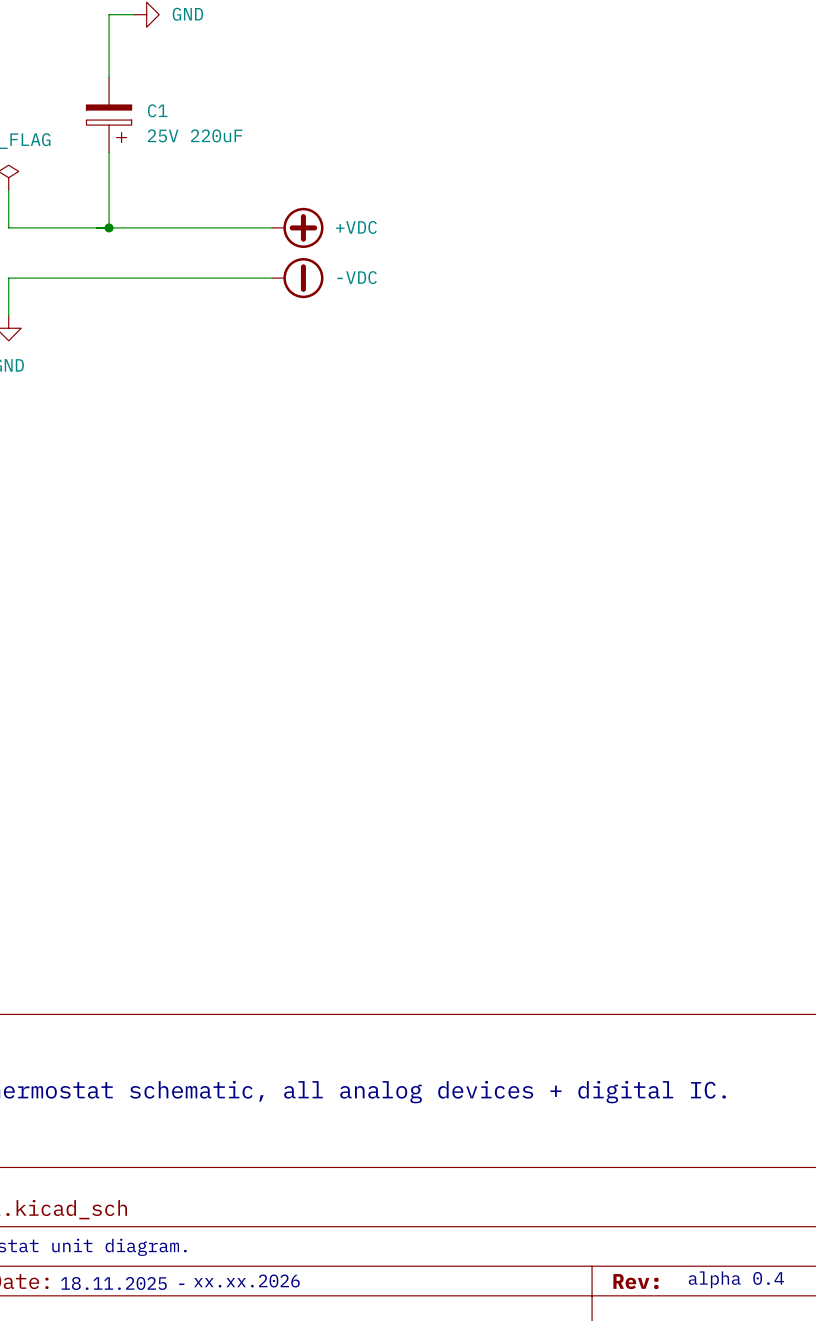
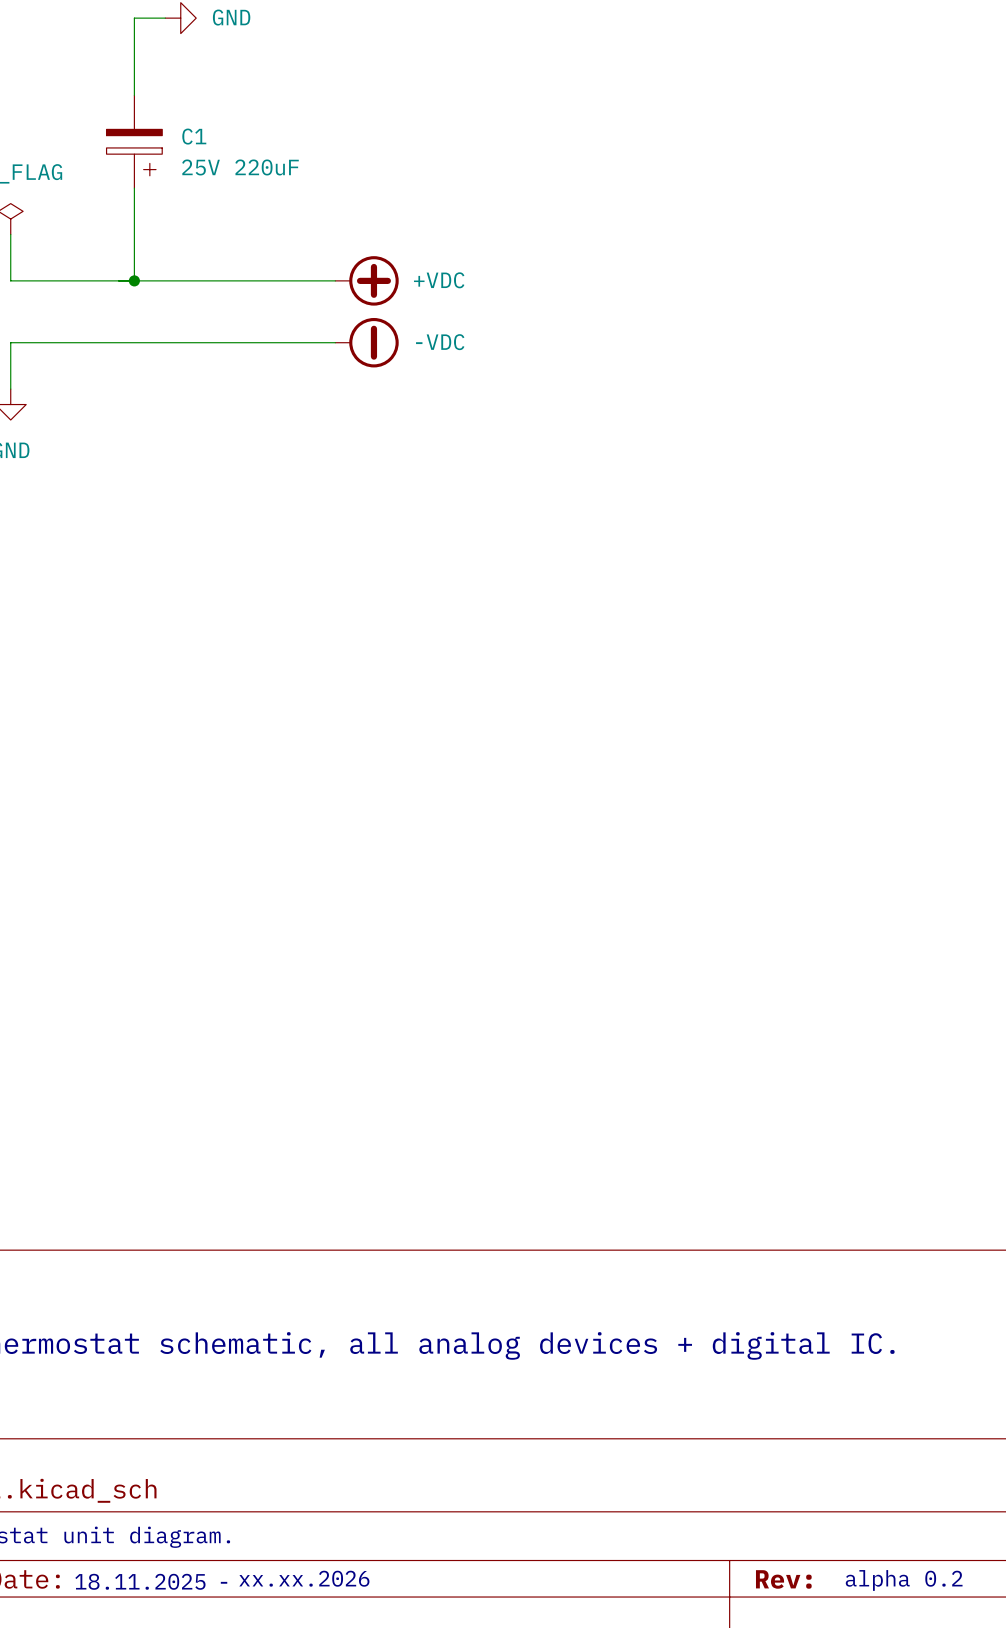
text: alpha 0.4 (736, 1279) -> alpha 0.2 (904, 1580)

